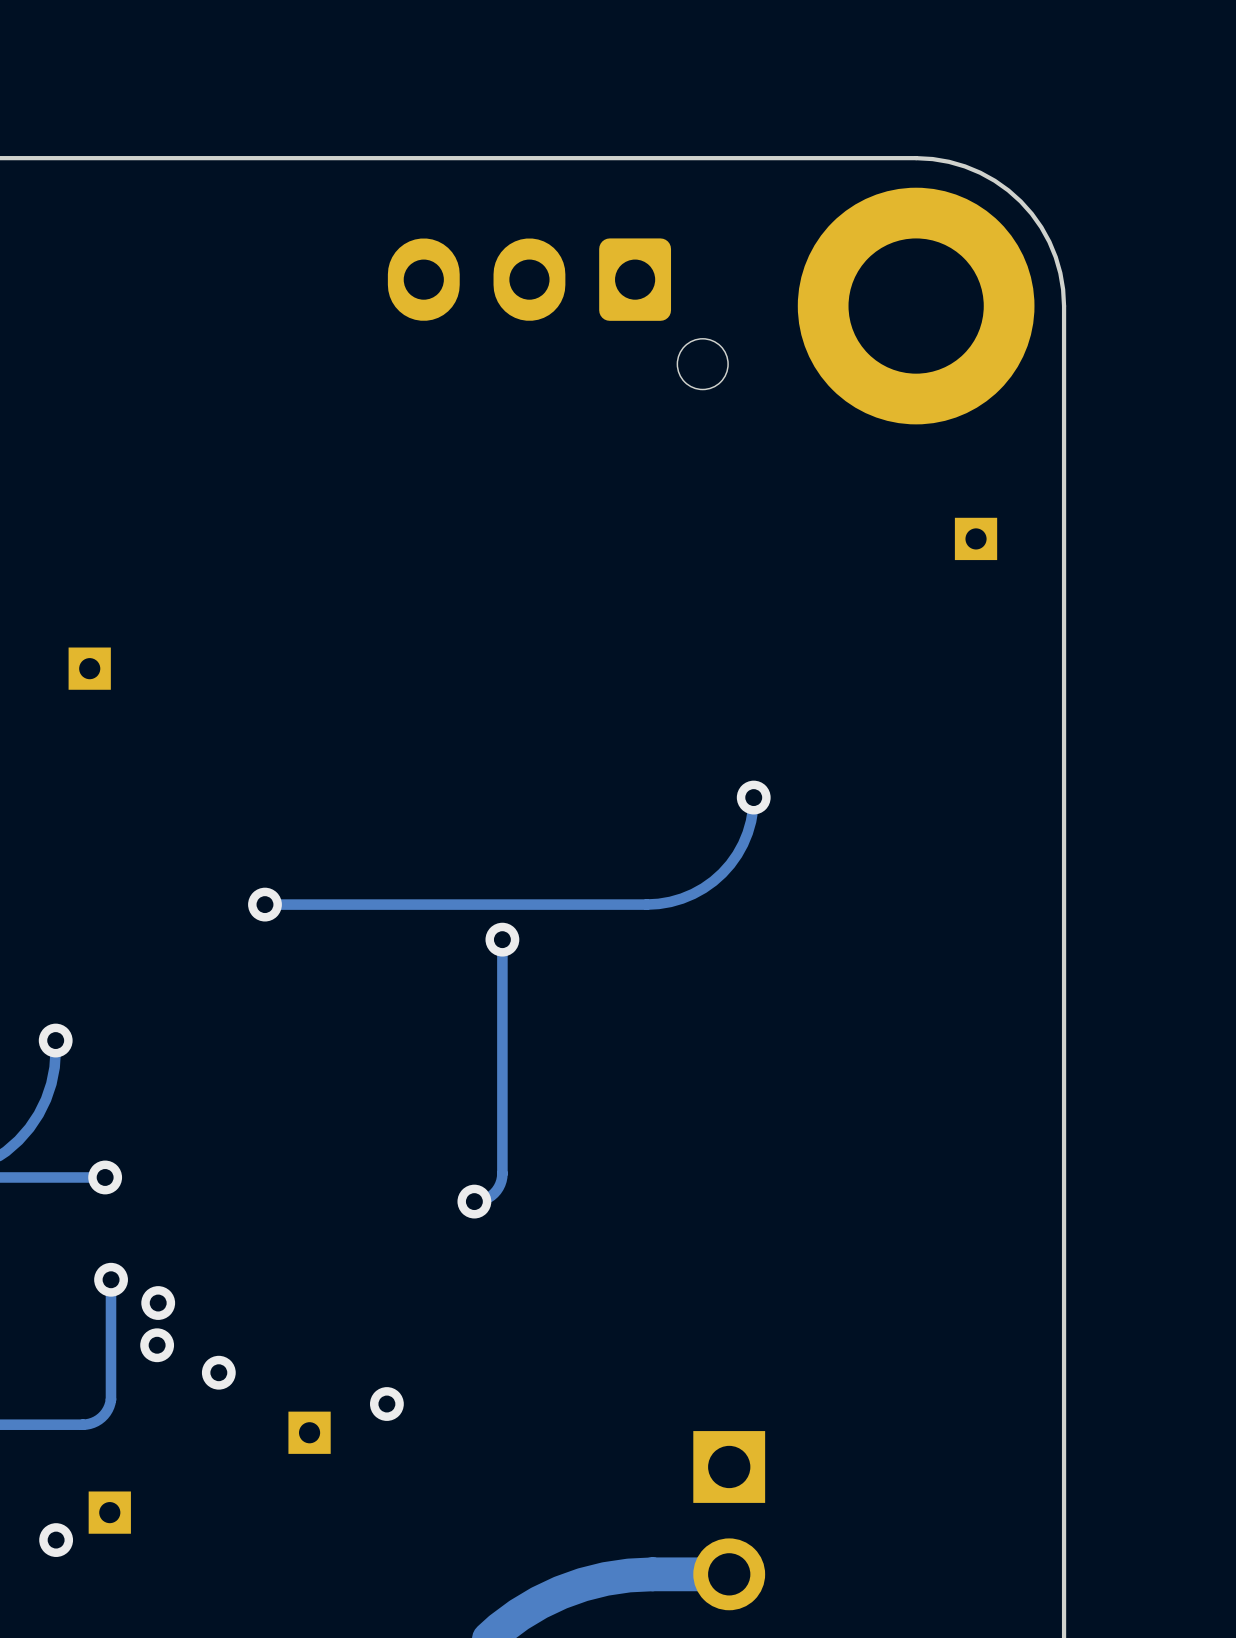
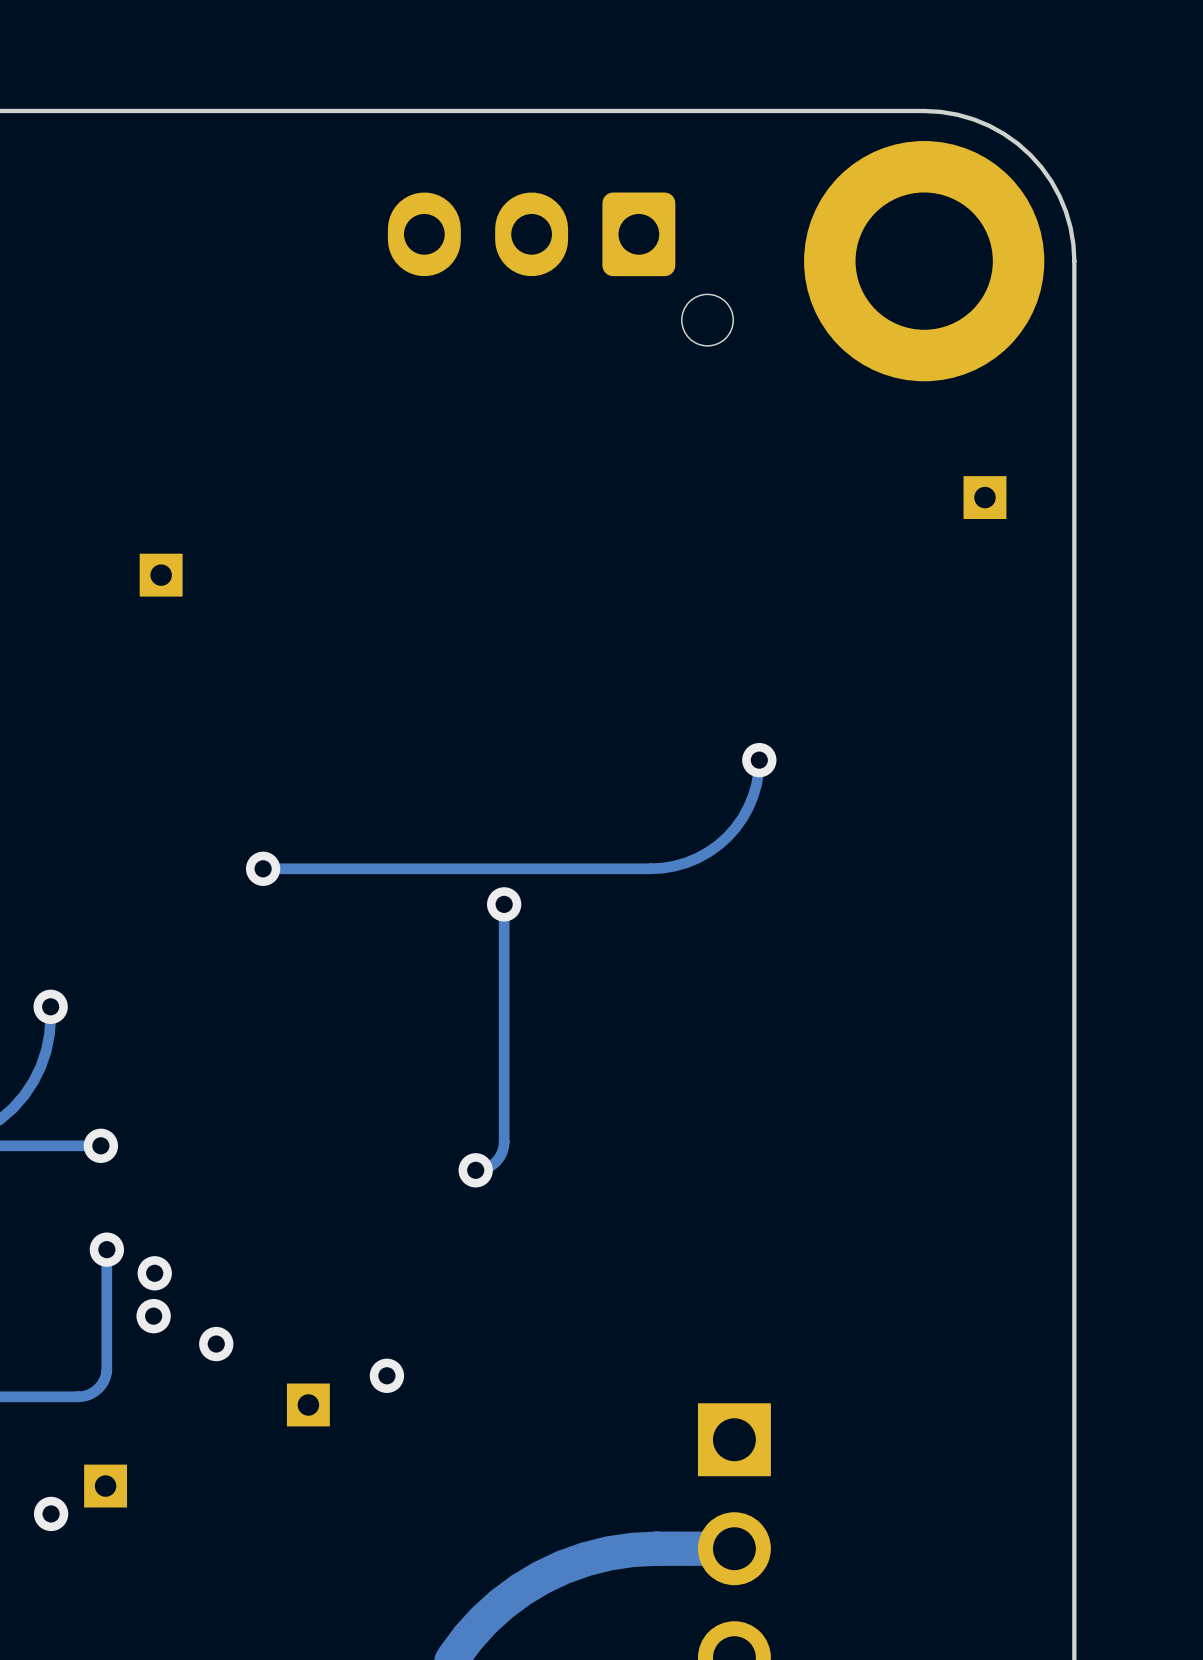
part position: (89, 668) -> (161, 575)

